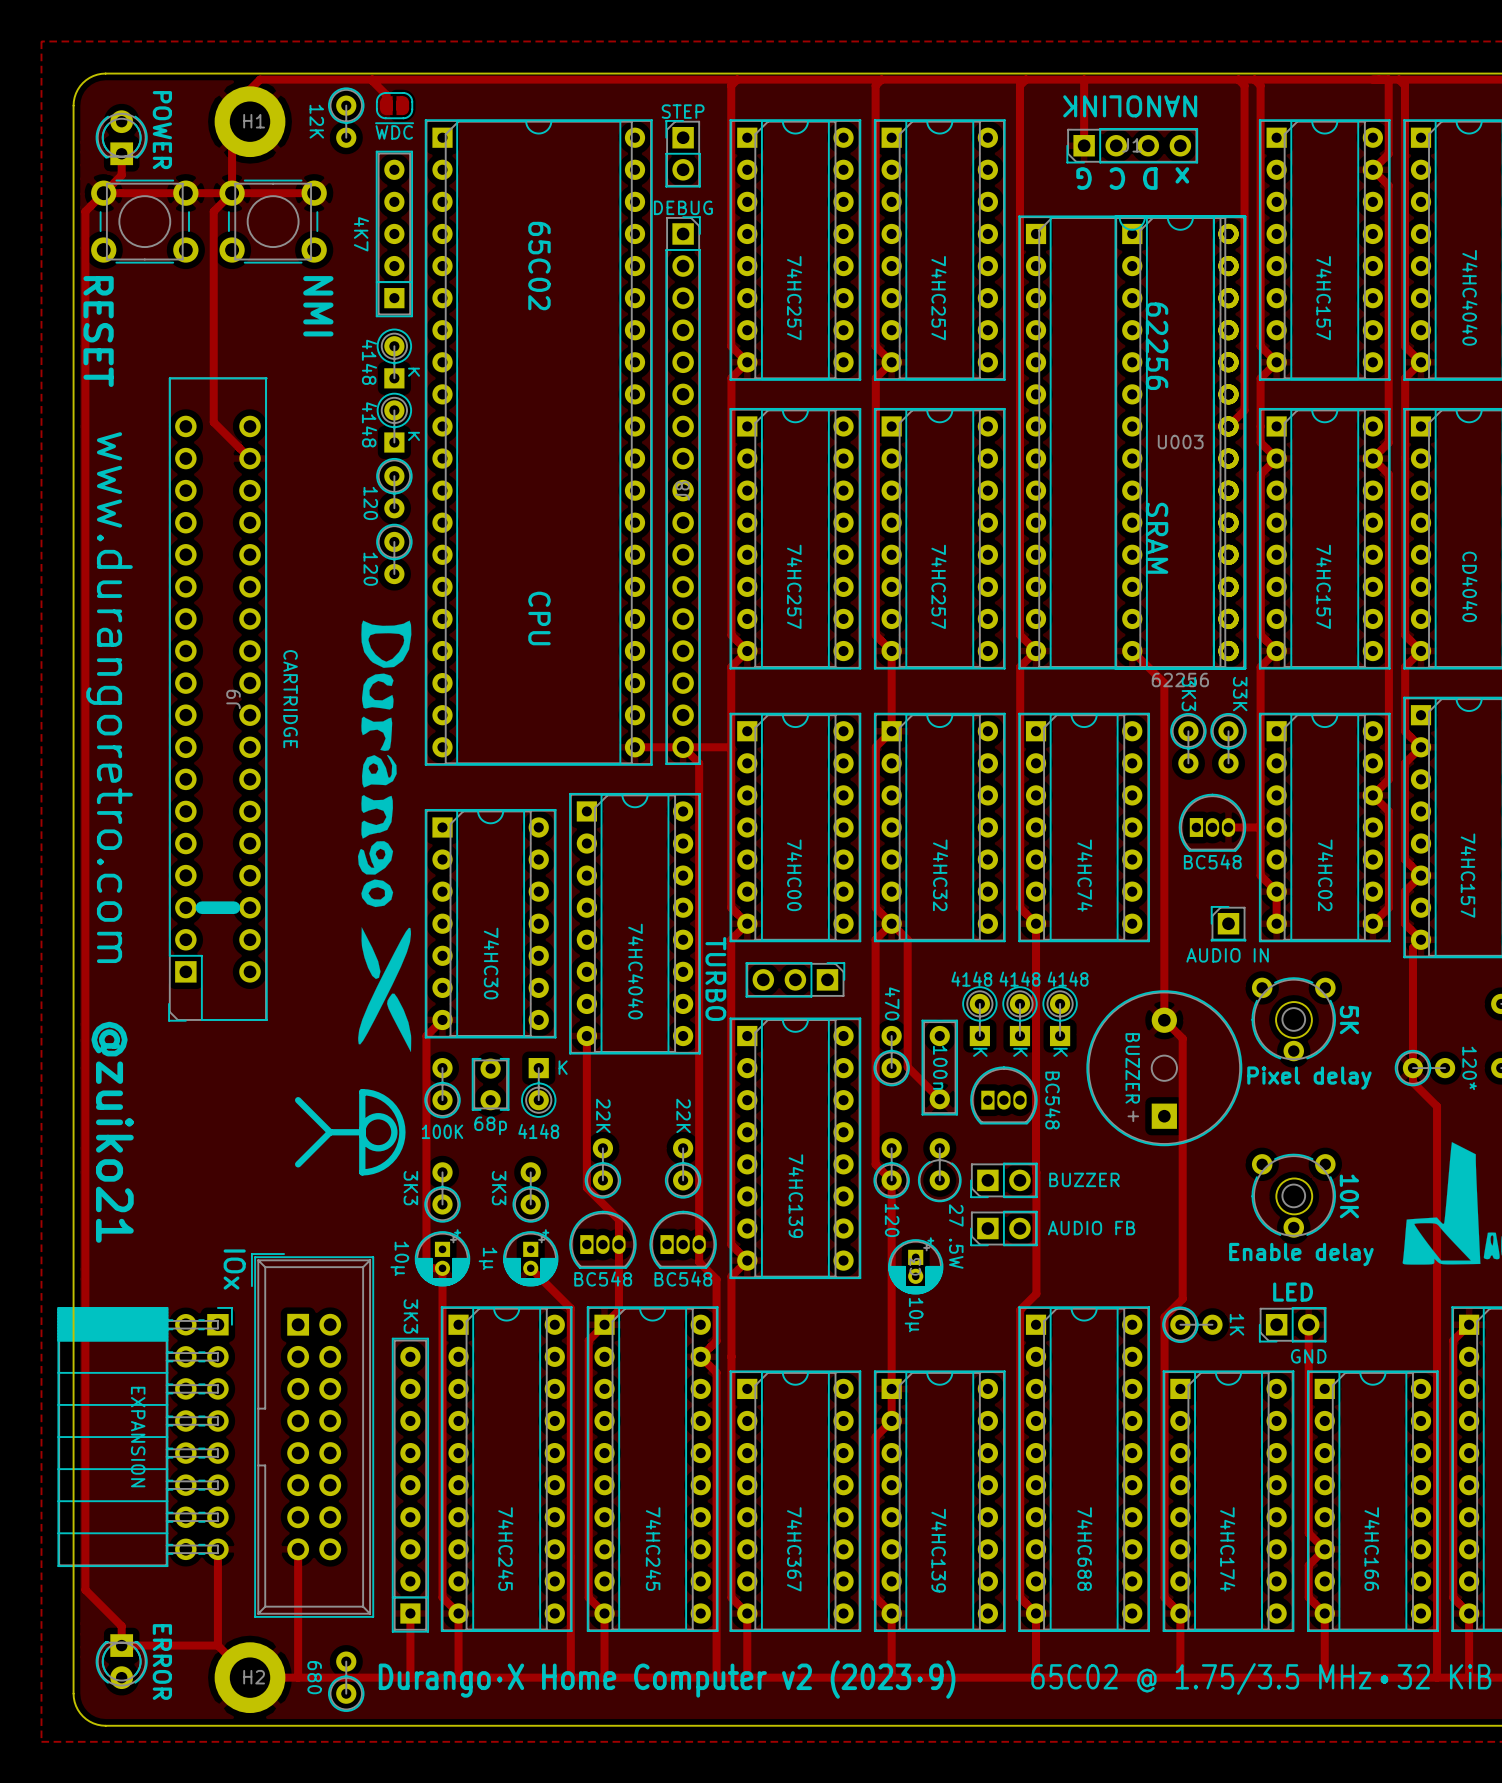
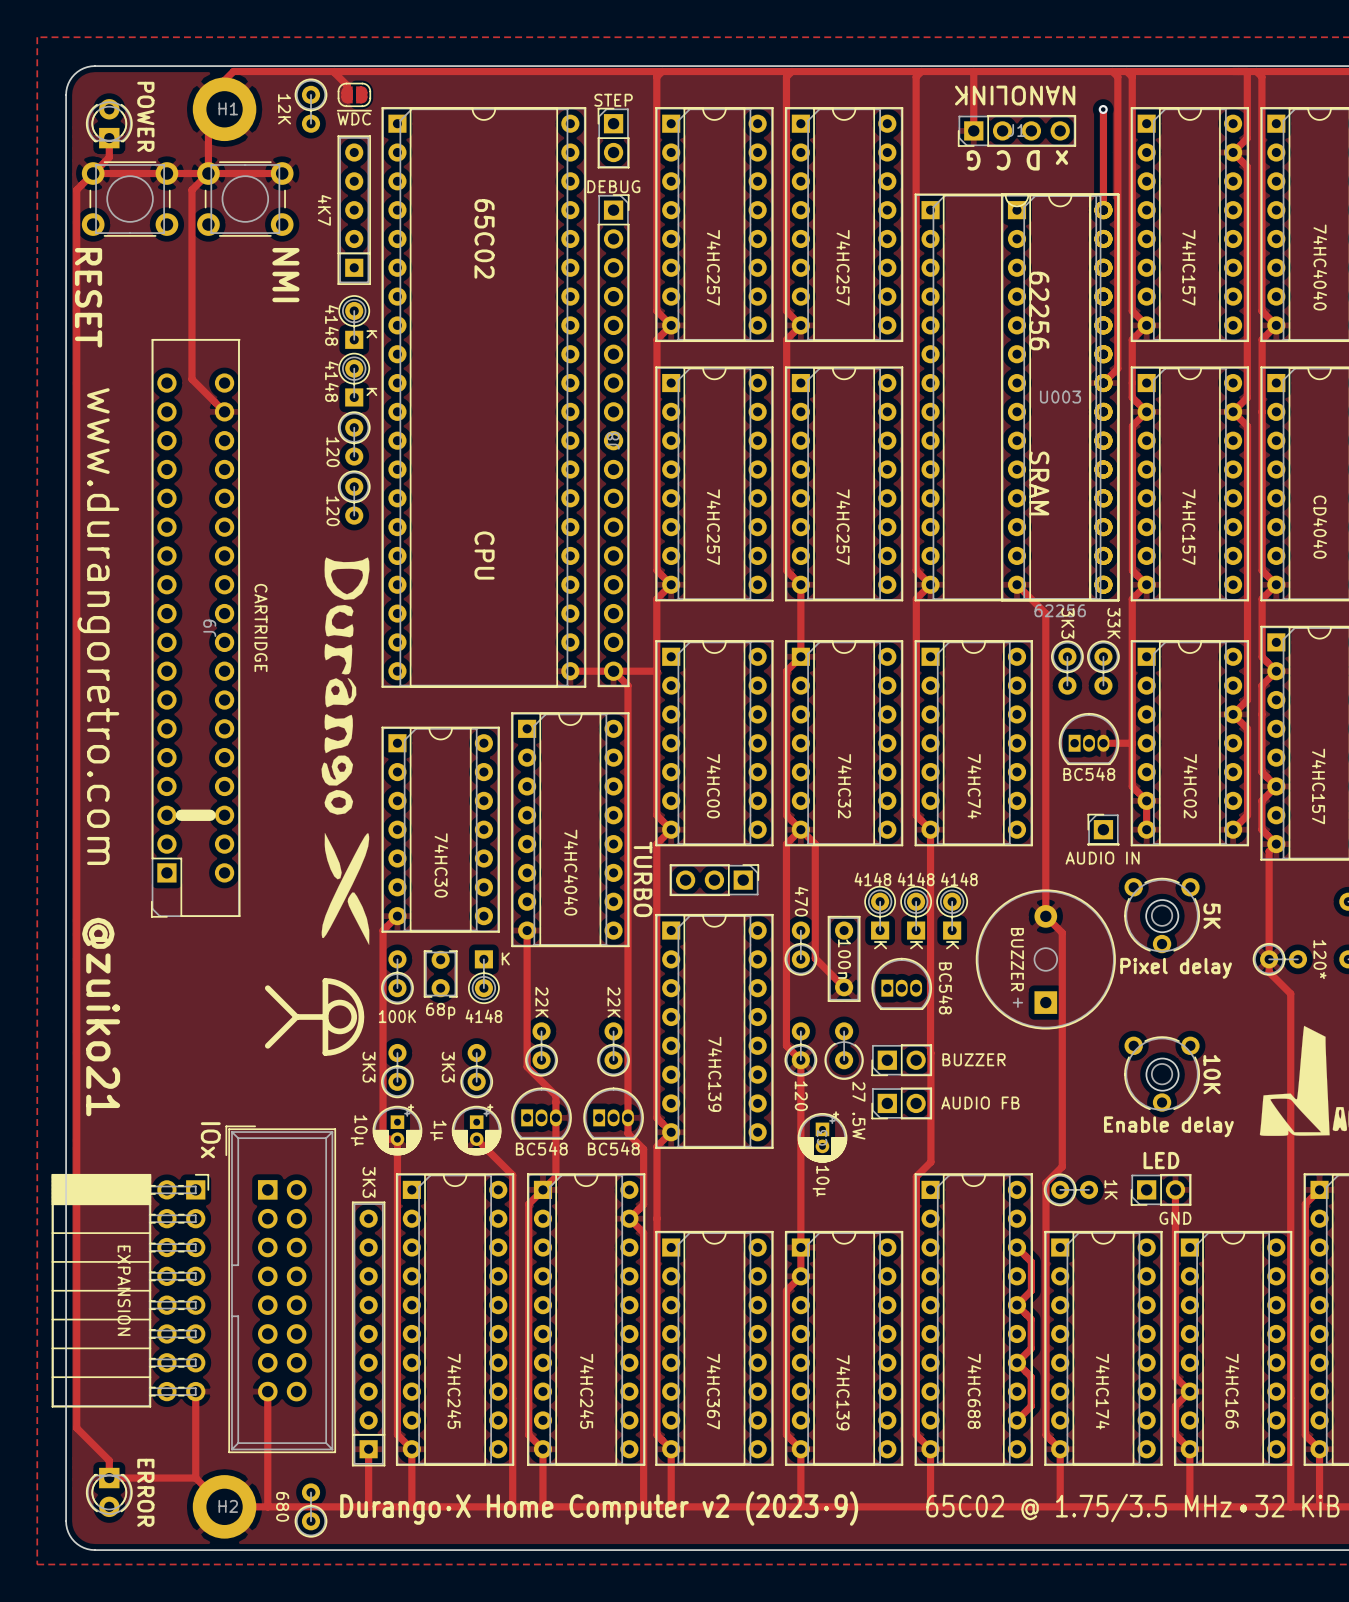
via: none -> (1103, 109)
track: none -> (1103, 109) (1103, 210)
track: none -> (1016, 1247) (1031, 1261) (1031, 1290) (1016, 1305) (1031, 1319) (1031, 1348) (1016, 1362) (1031, 1376) (1031, 1406) (1016, 1420)

